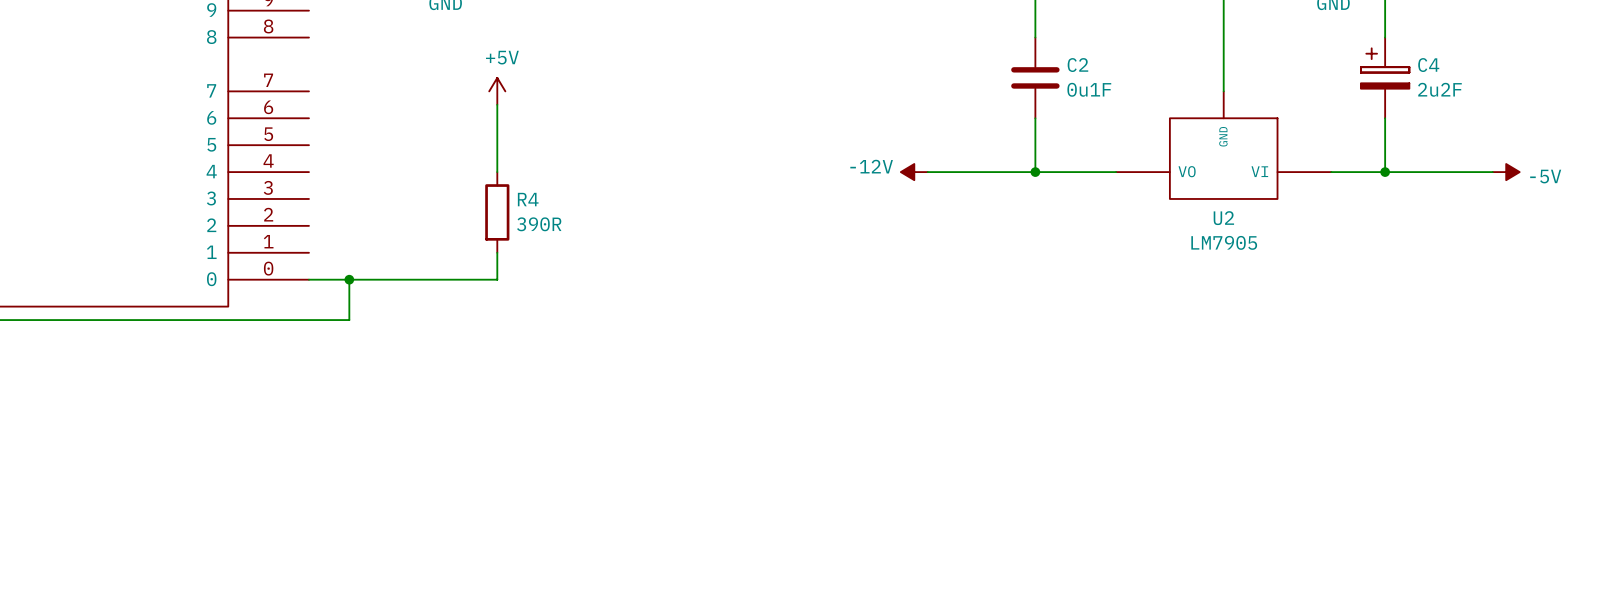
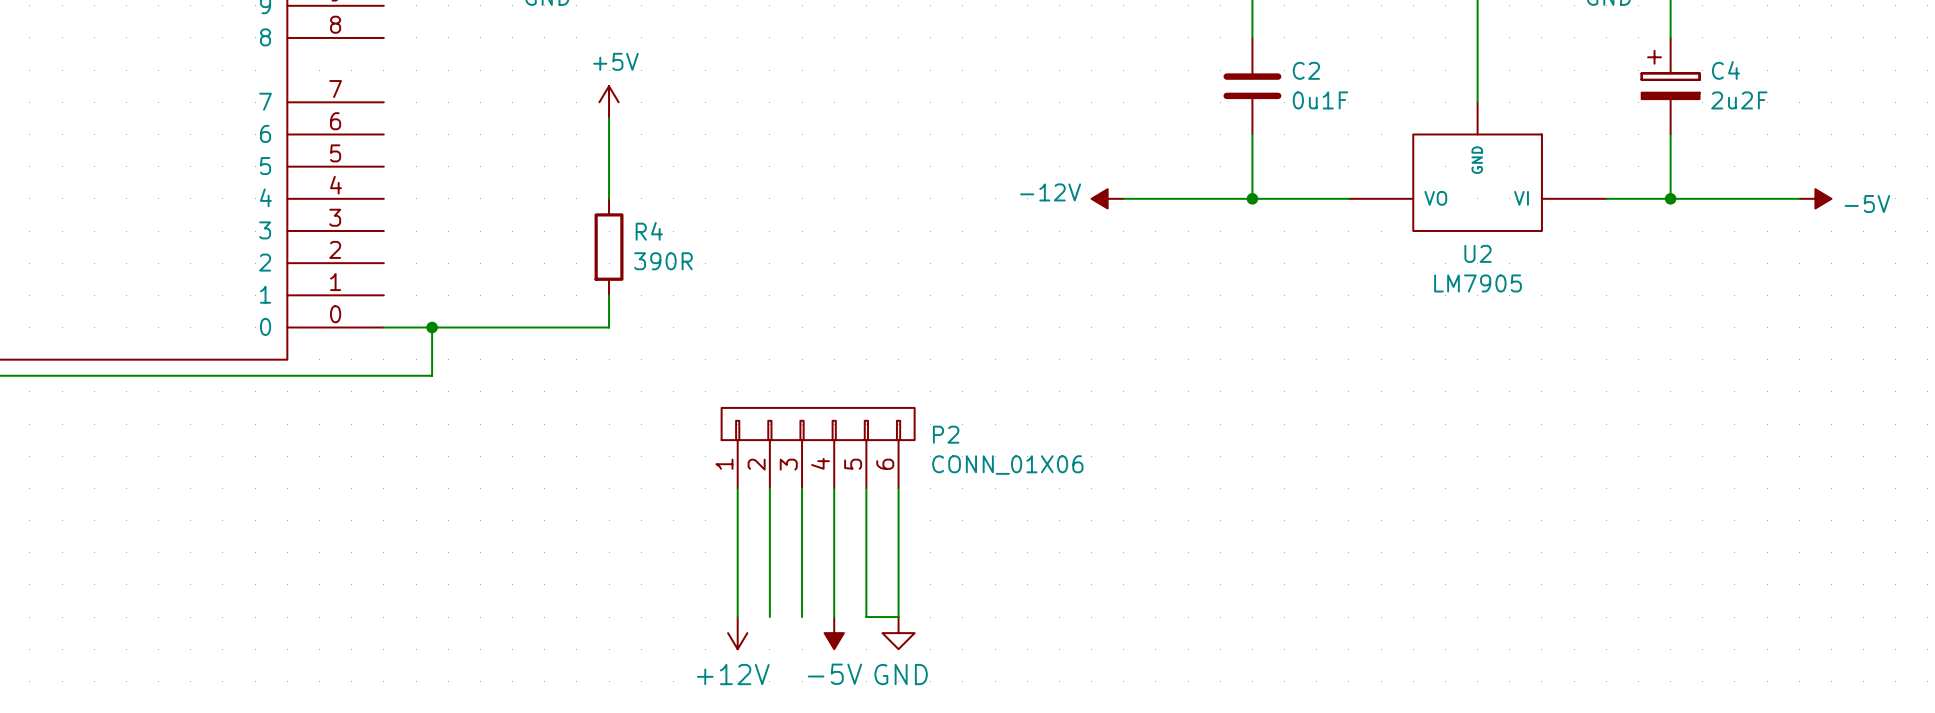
P2: none -> CONN_01X06 (818, 448)
wire: none -> (737, 488) (737, 617)
wire: none -> (769, 488) (769, 617)
wire: none -> (802, 488) (802, 617)
wire: none -> (834, 488) (834, 617)
wire: none -> (866, 488) (866, 617) (898, 617) (898, 488)
power symbol: none -> +12V (737, 633)
power symbol: none -> -5V (834, 633)
power symbol: none -> GND (898, 633)

